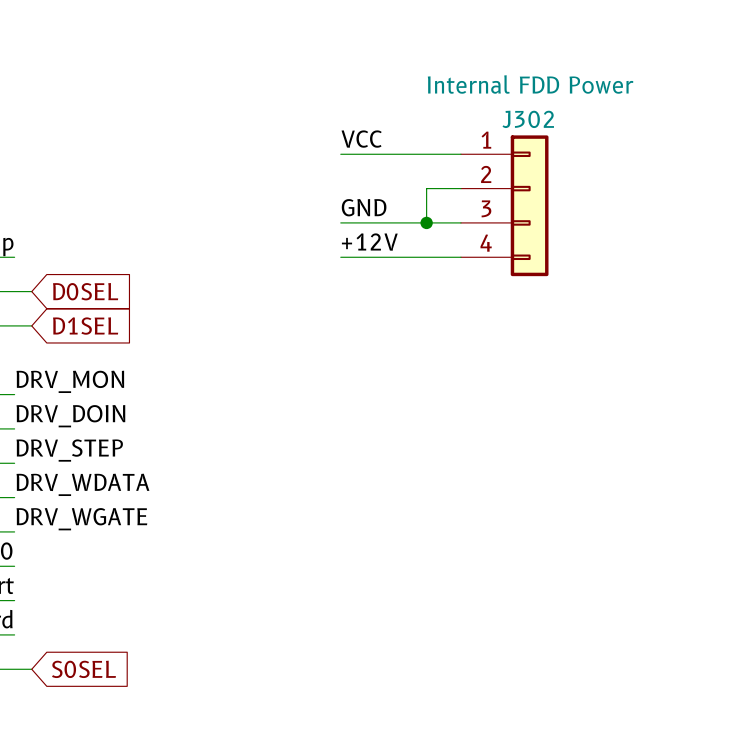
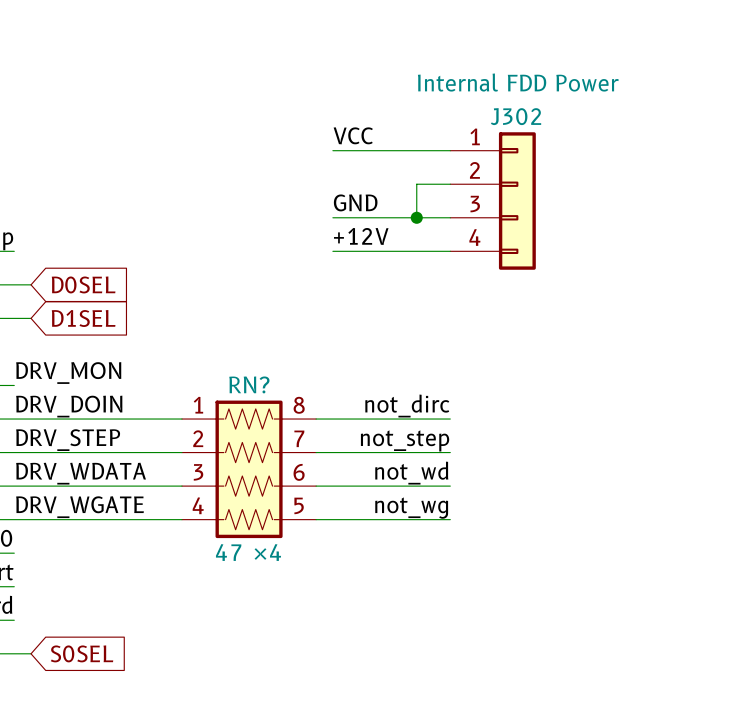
label: none -> not_dirc (407, 406)
wire: none -> (14, 419) (181, 419)
wire: none -> (316, 419) (450, 419)
label: none -> not_step (405, 440)
wire: none -> (14, 452) (181, 452)
wire: none -> (316, 452) (450, 452)
RN?: none -> 47 ×4 (249, 469)
label: none -> not_wd (411, 473)
wire: none -> (14, 486) (181, 486)
wire: none -> (316, 486) (450, 486)
label: none -> not_wg (411, 508)
wire: none -> (14, 519) (181, 519)
wire: none -> (316, 519) (450, 519)

